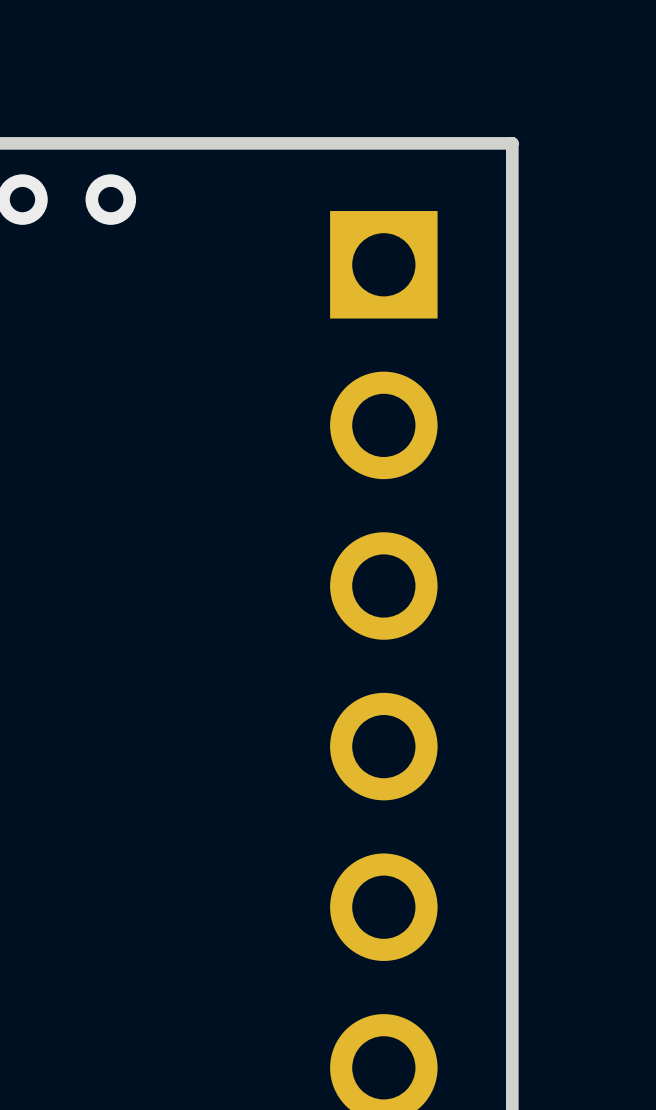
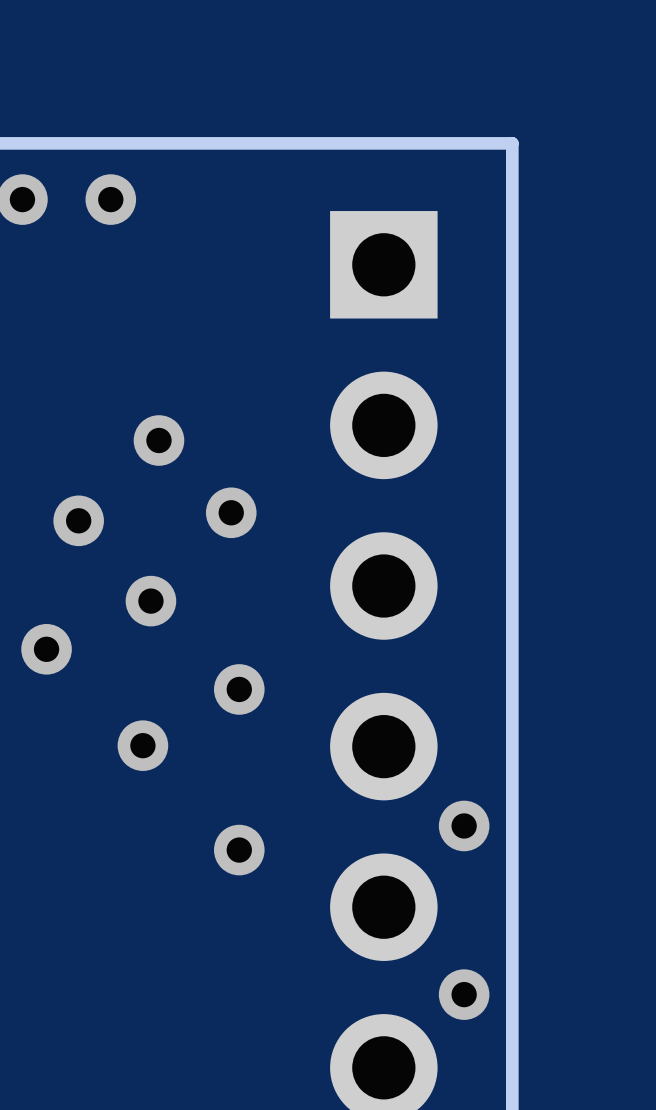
via: none -> (158, 440)
via: none -> (231, 512)
via: none -> (78, 520)
via: none -> (150, 601)
via: none -> (46, 649)
via: none -> (239, 689)
via: none -> (142, 745)
via: none -> (464, 825)
via: none -> (239, 850)
via: none -> (464, 994)

